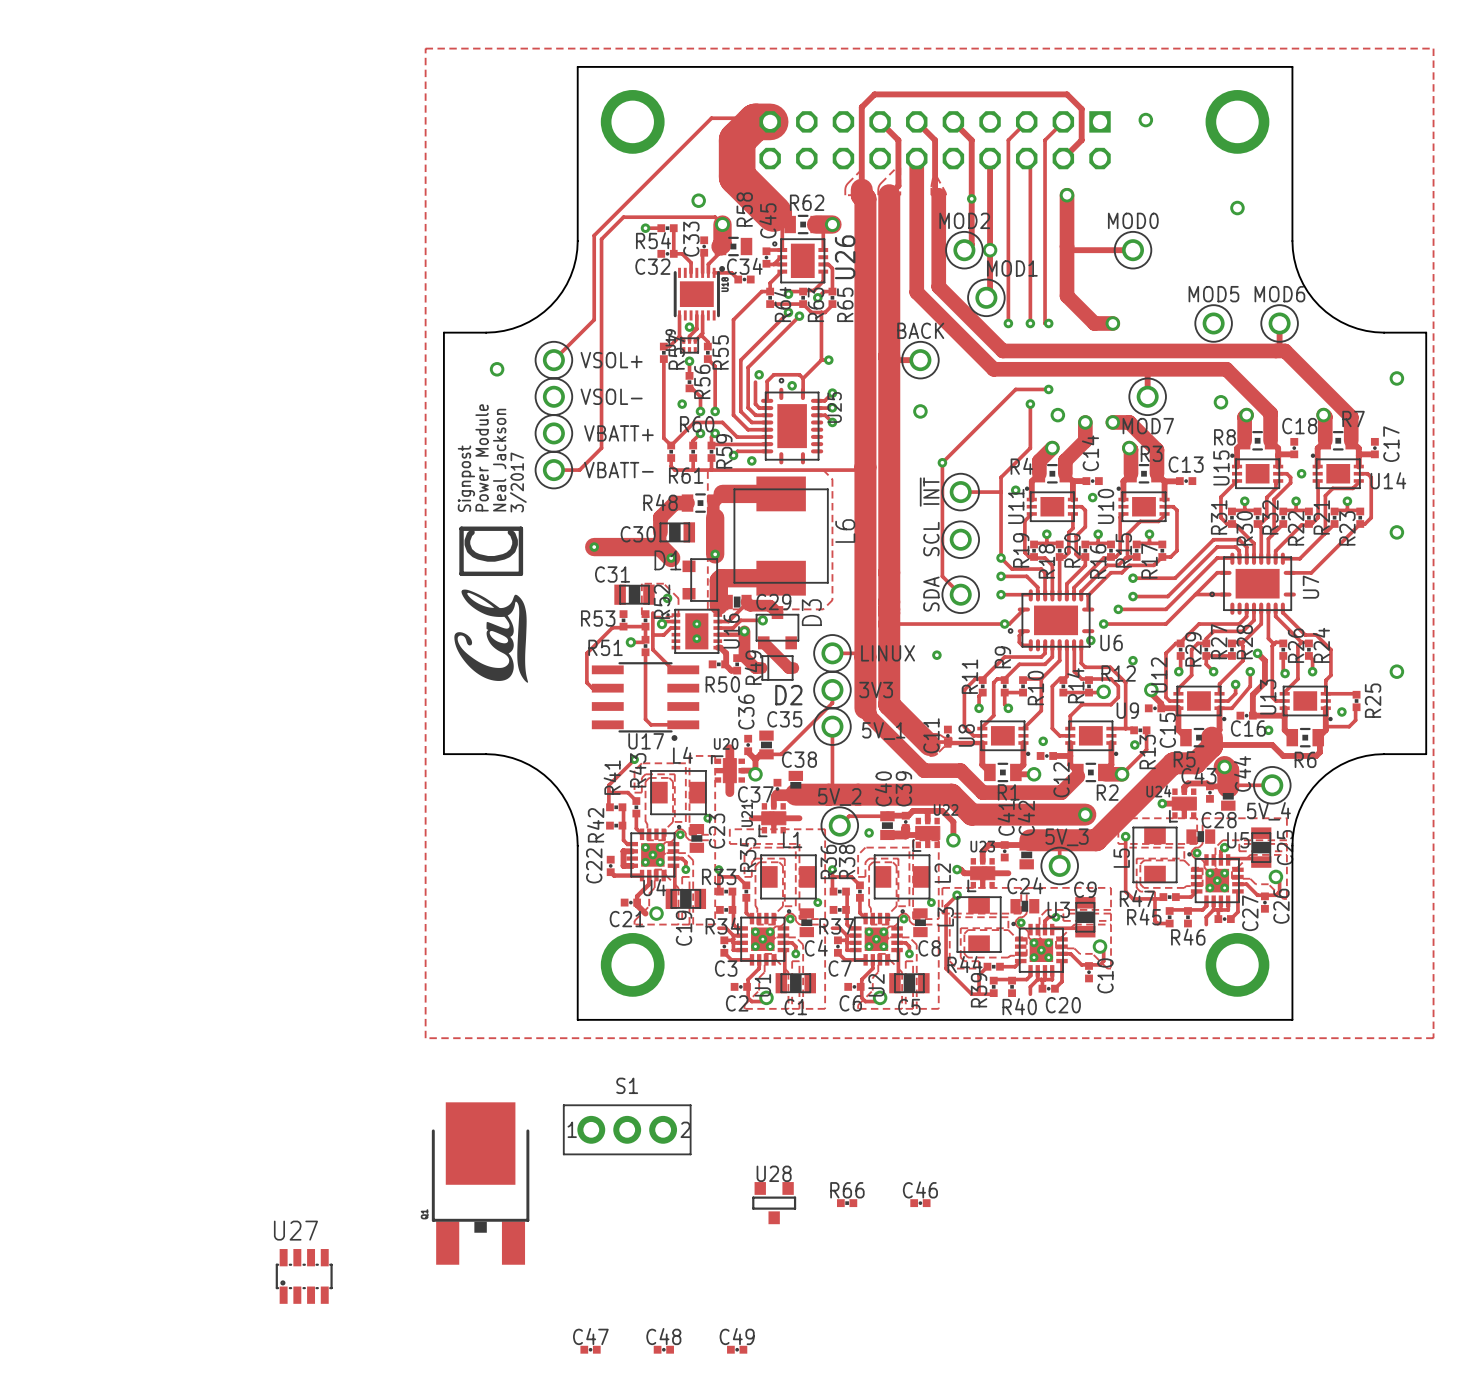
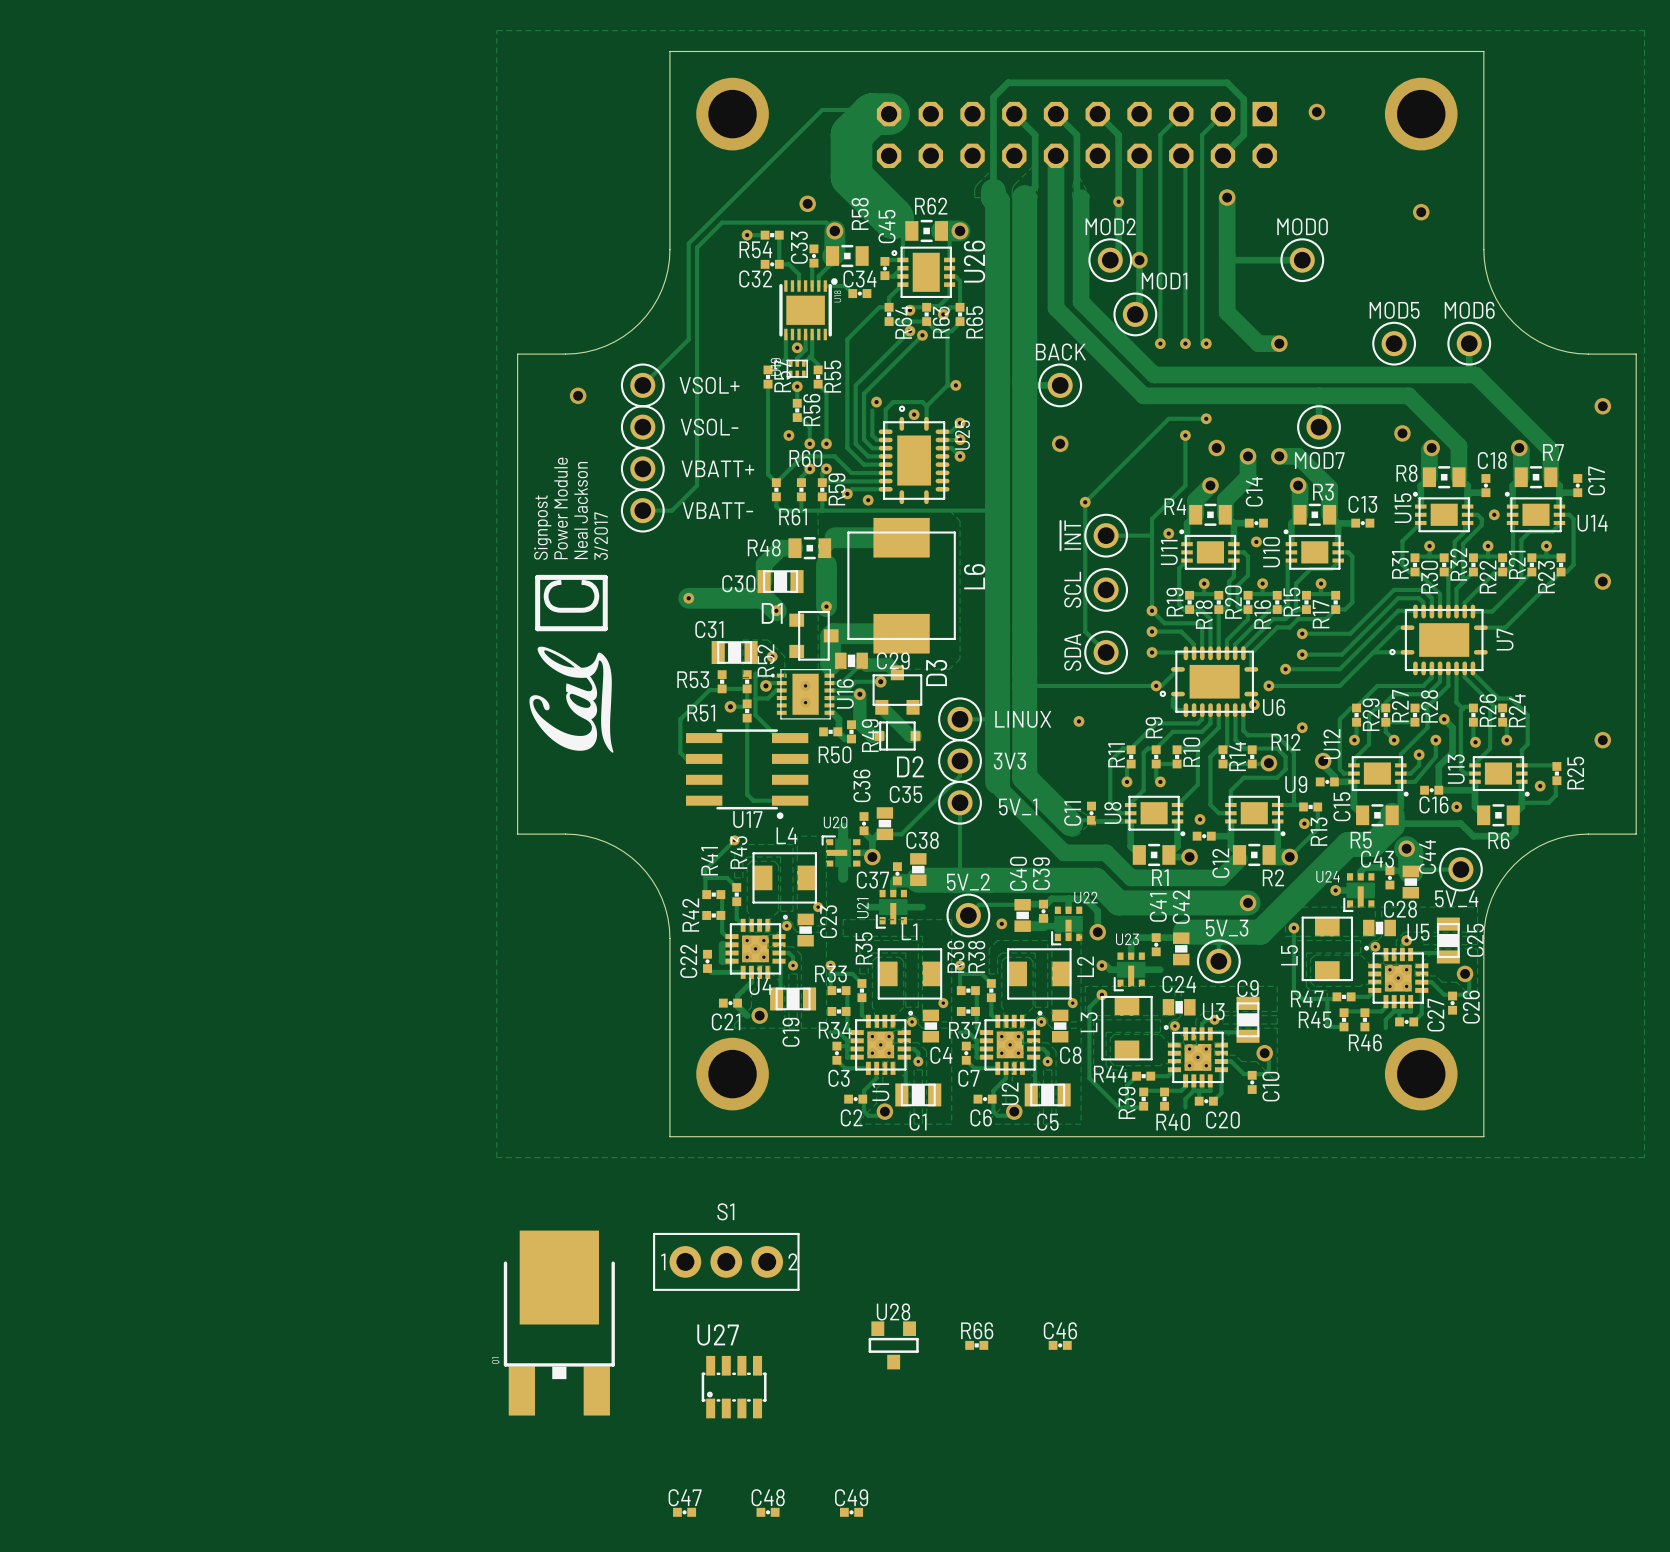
U27 position: (304, 1276) -> (734, 1387)

